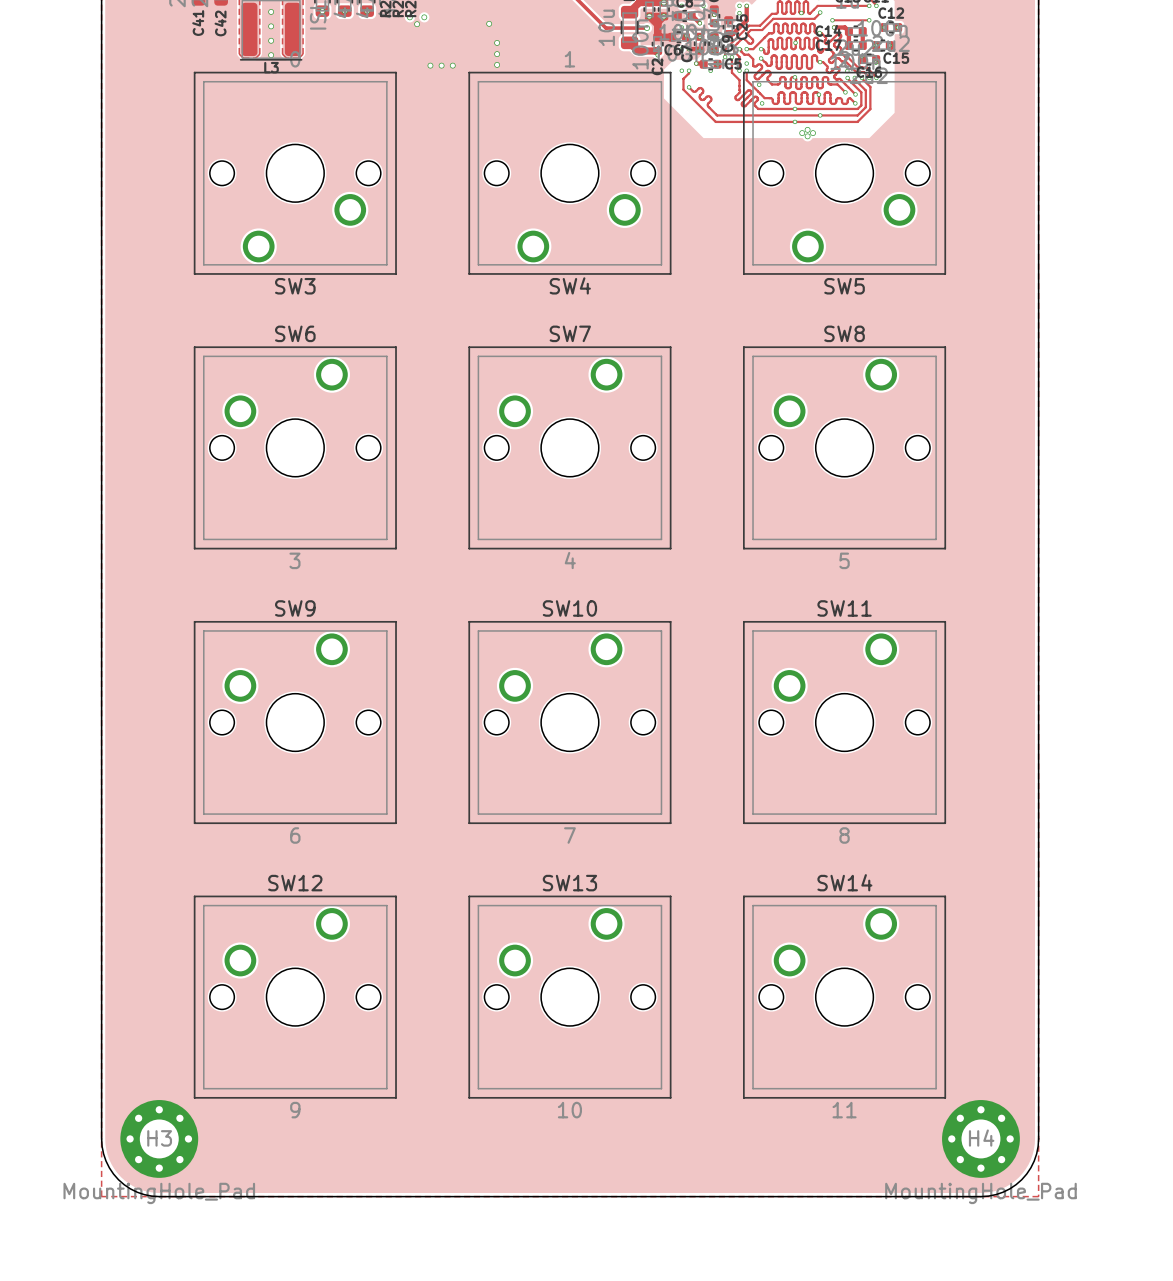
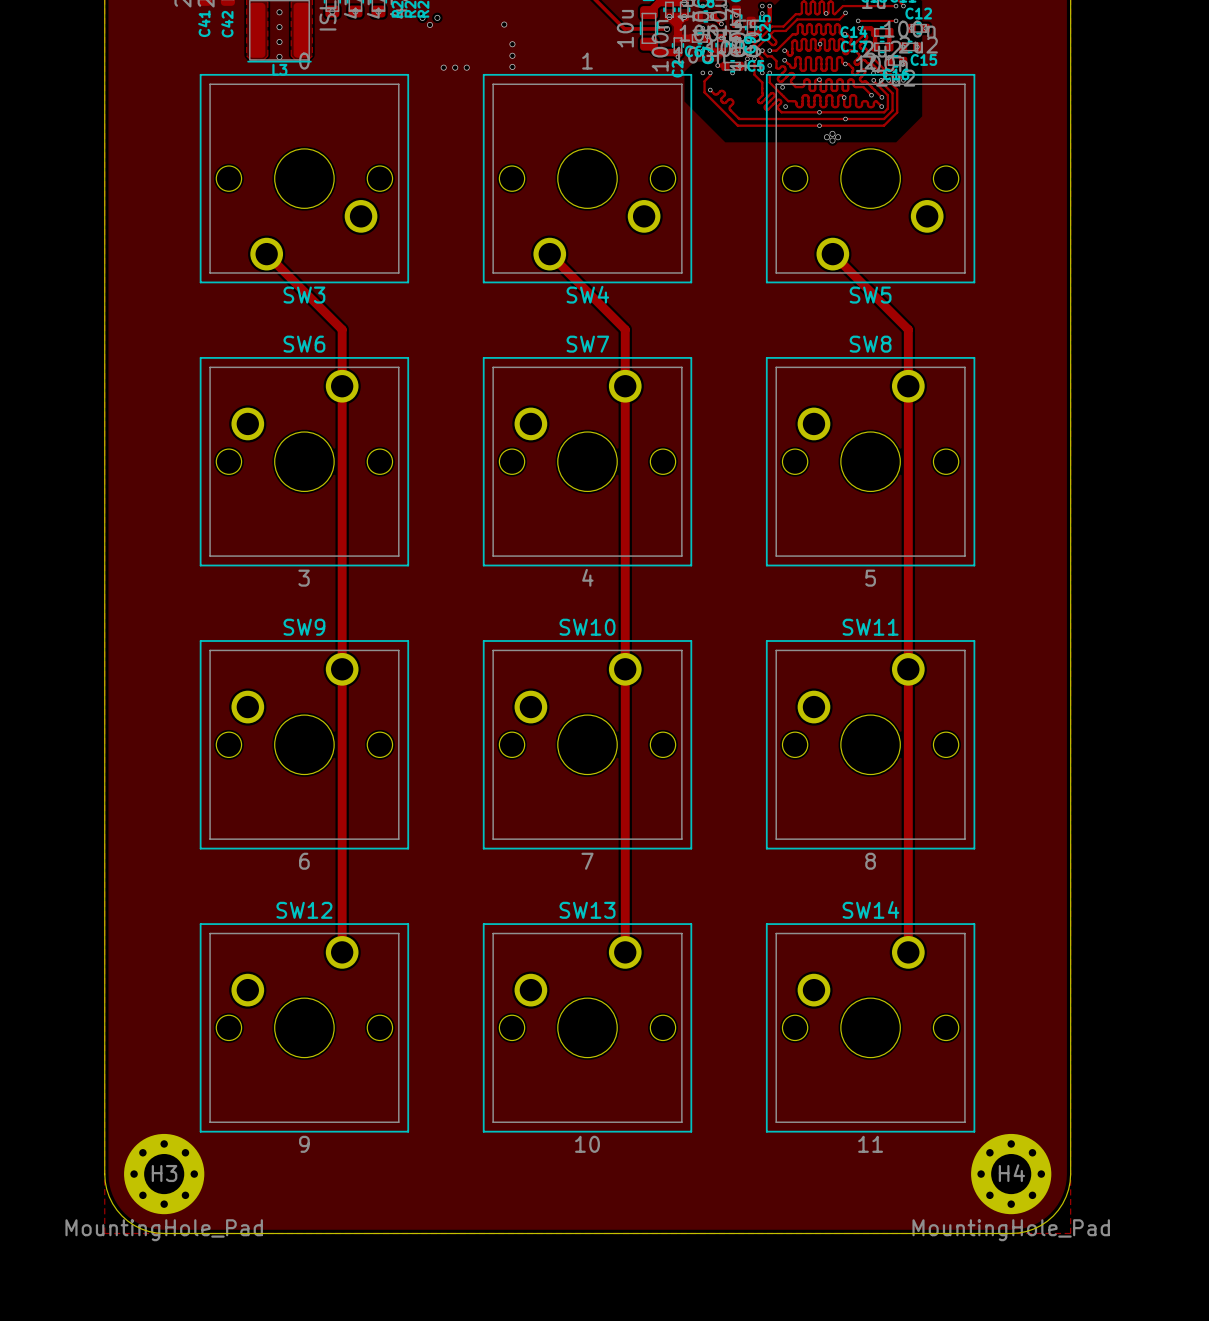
track: none -> (266, 254) (342, 329) (342, 952)
track: none -> (549, 254) (625, 329) (625, 952)
track: none -> (832, 254) (908, 329) (908, 952)

